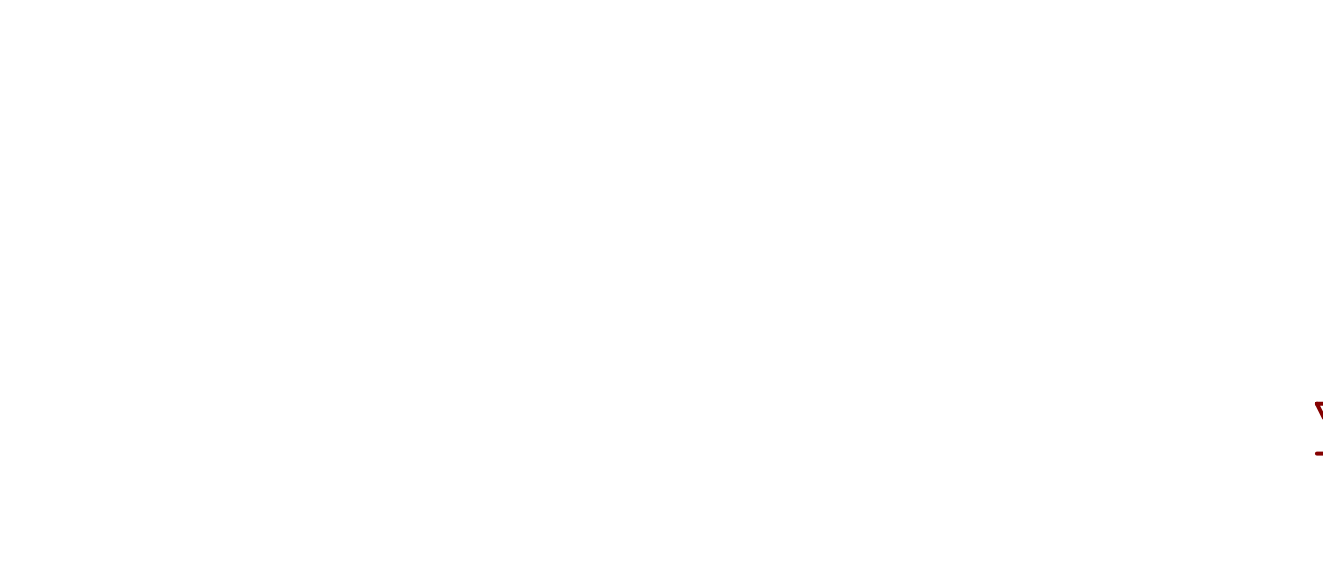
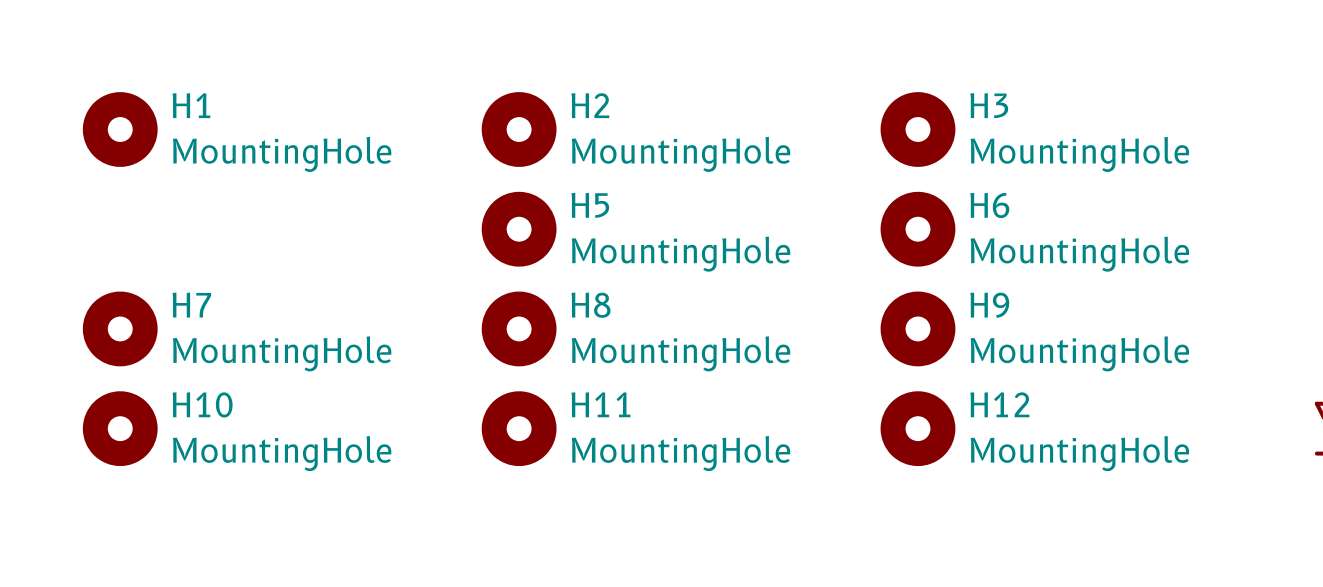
H1: none -> MountingHole (120, 129)
H2: none -> MountingHole (519, 129)
H3: none -> MountingHole (917, 129)
H5: none -> MountingHole (519, 229)
H6: none -> MountingHole (917, 229)
H7: none -> MountingHole (120, 328)
H8: none -> MountingHole (519, 328)
H9: none -> MountingHole (917, 328)
H10: none -> MountingHole (120, 428)
H11: none -> MountingHole (519, 428)
H12: none -> MountingHole (917, 428)

